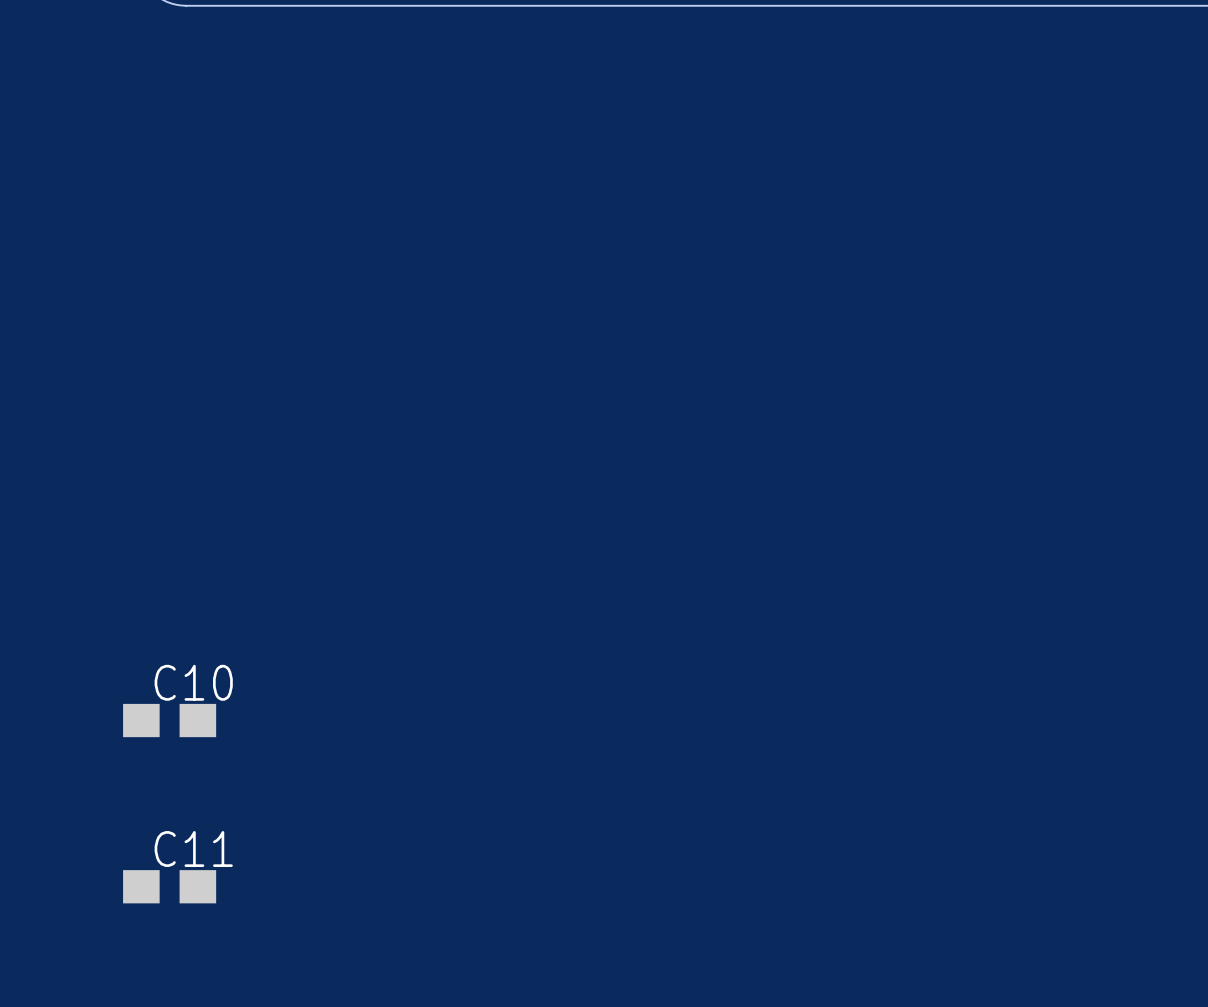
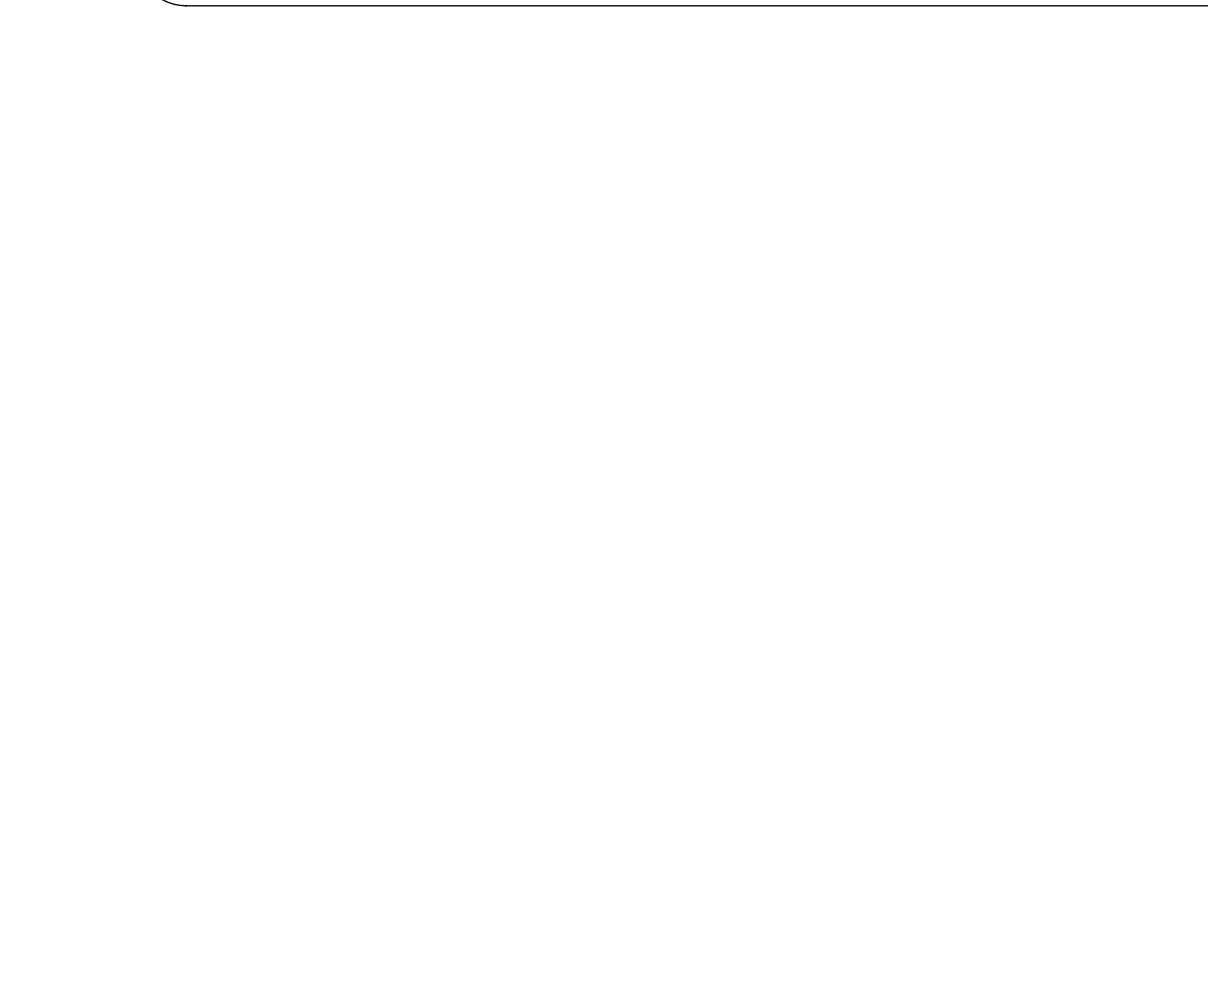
C10: (169, 720) -> none
C11: (169, 886) -> none

